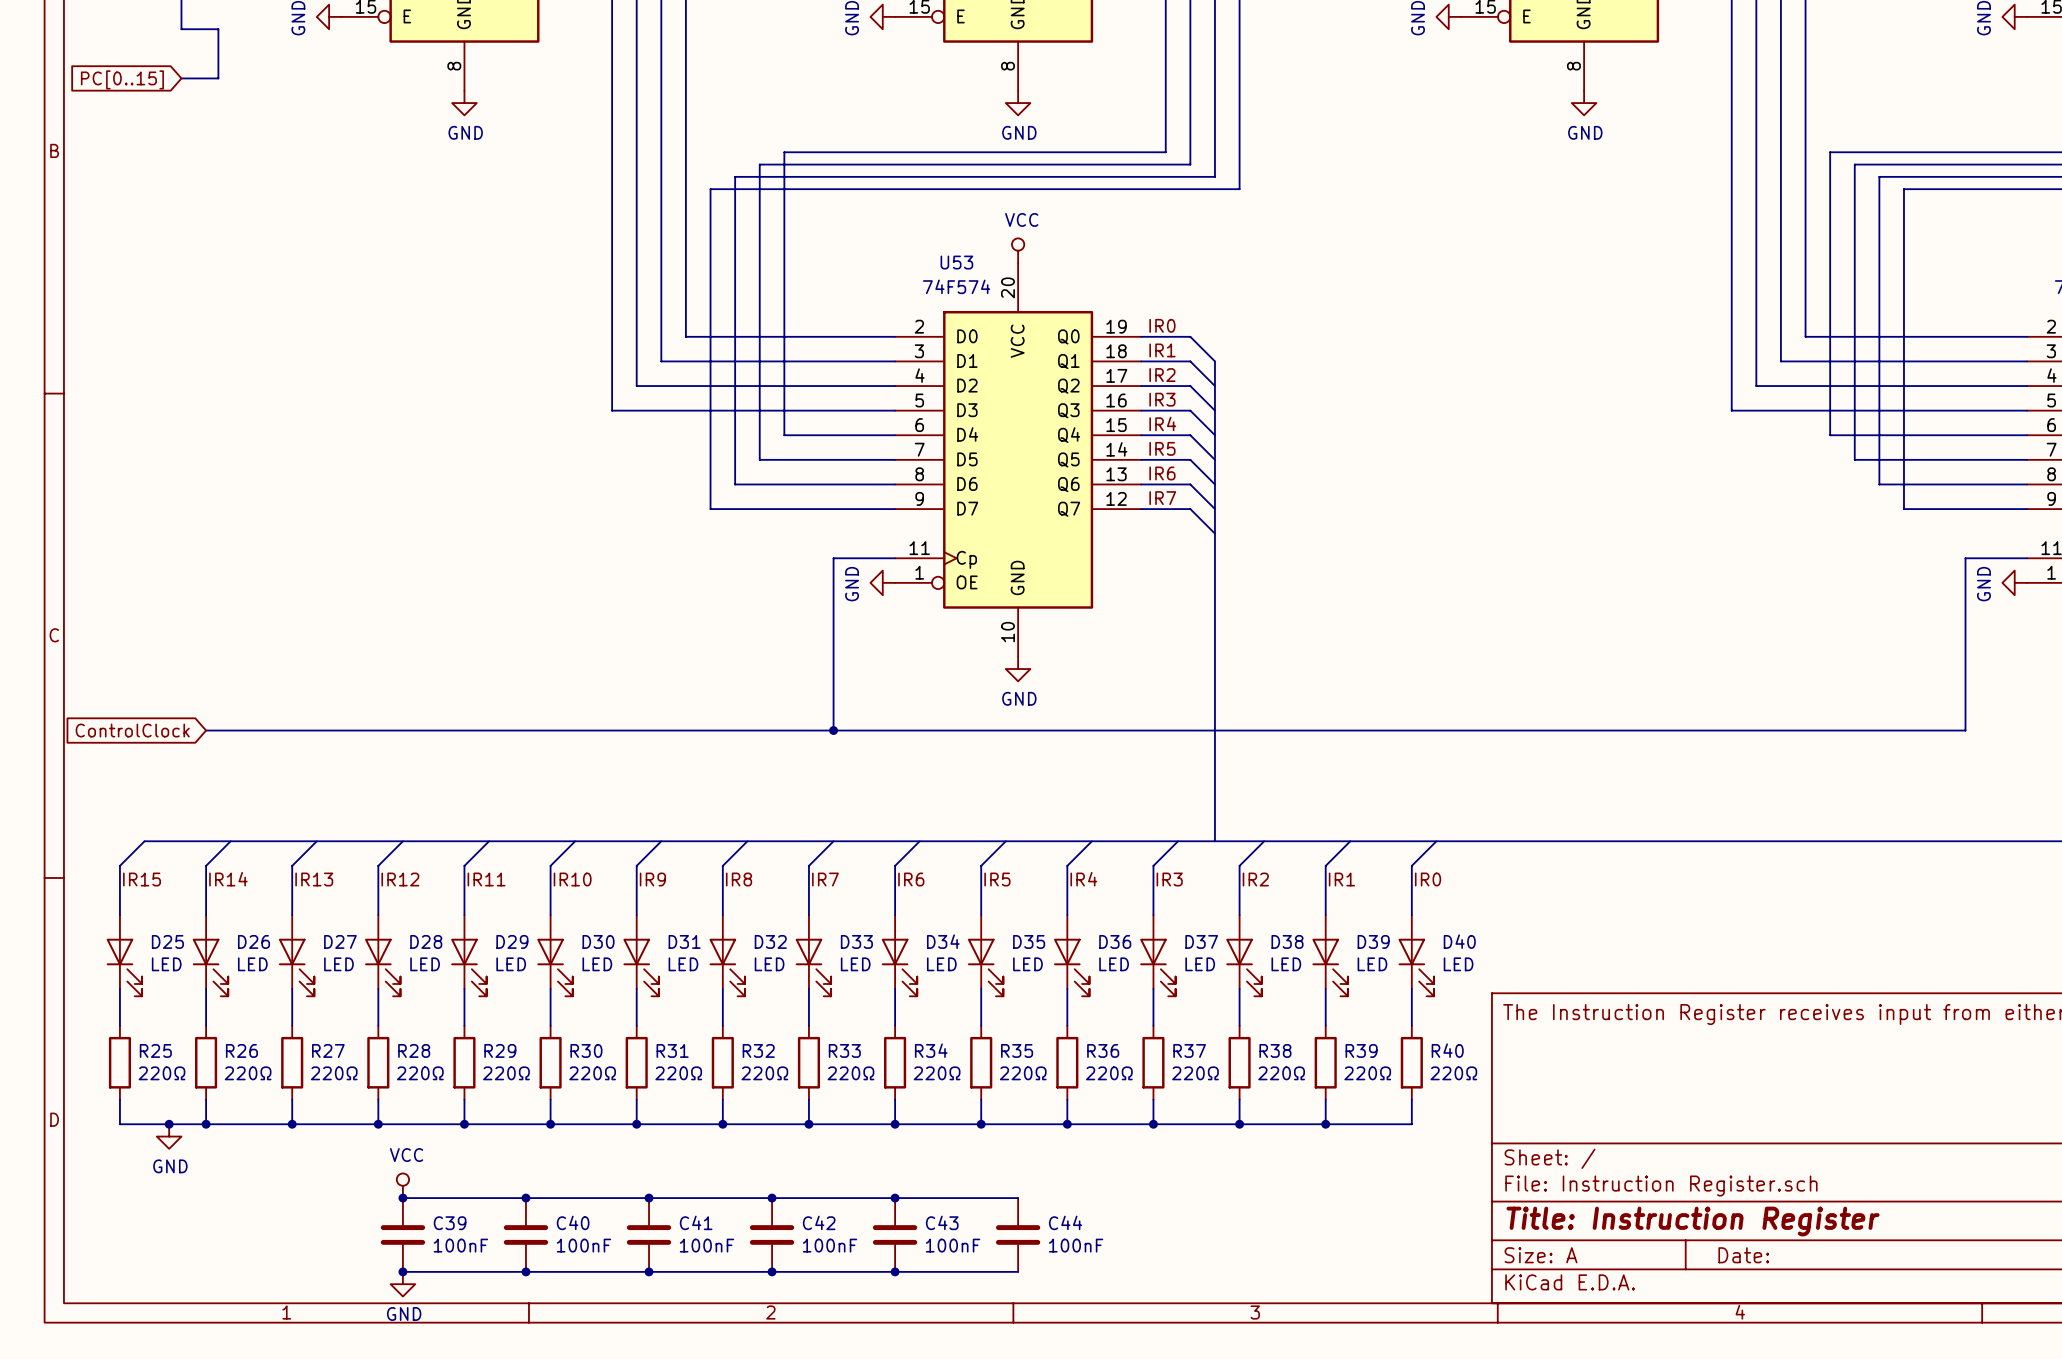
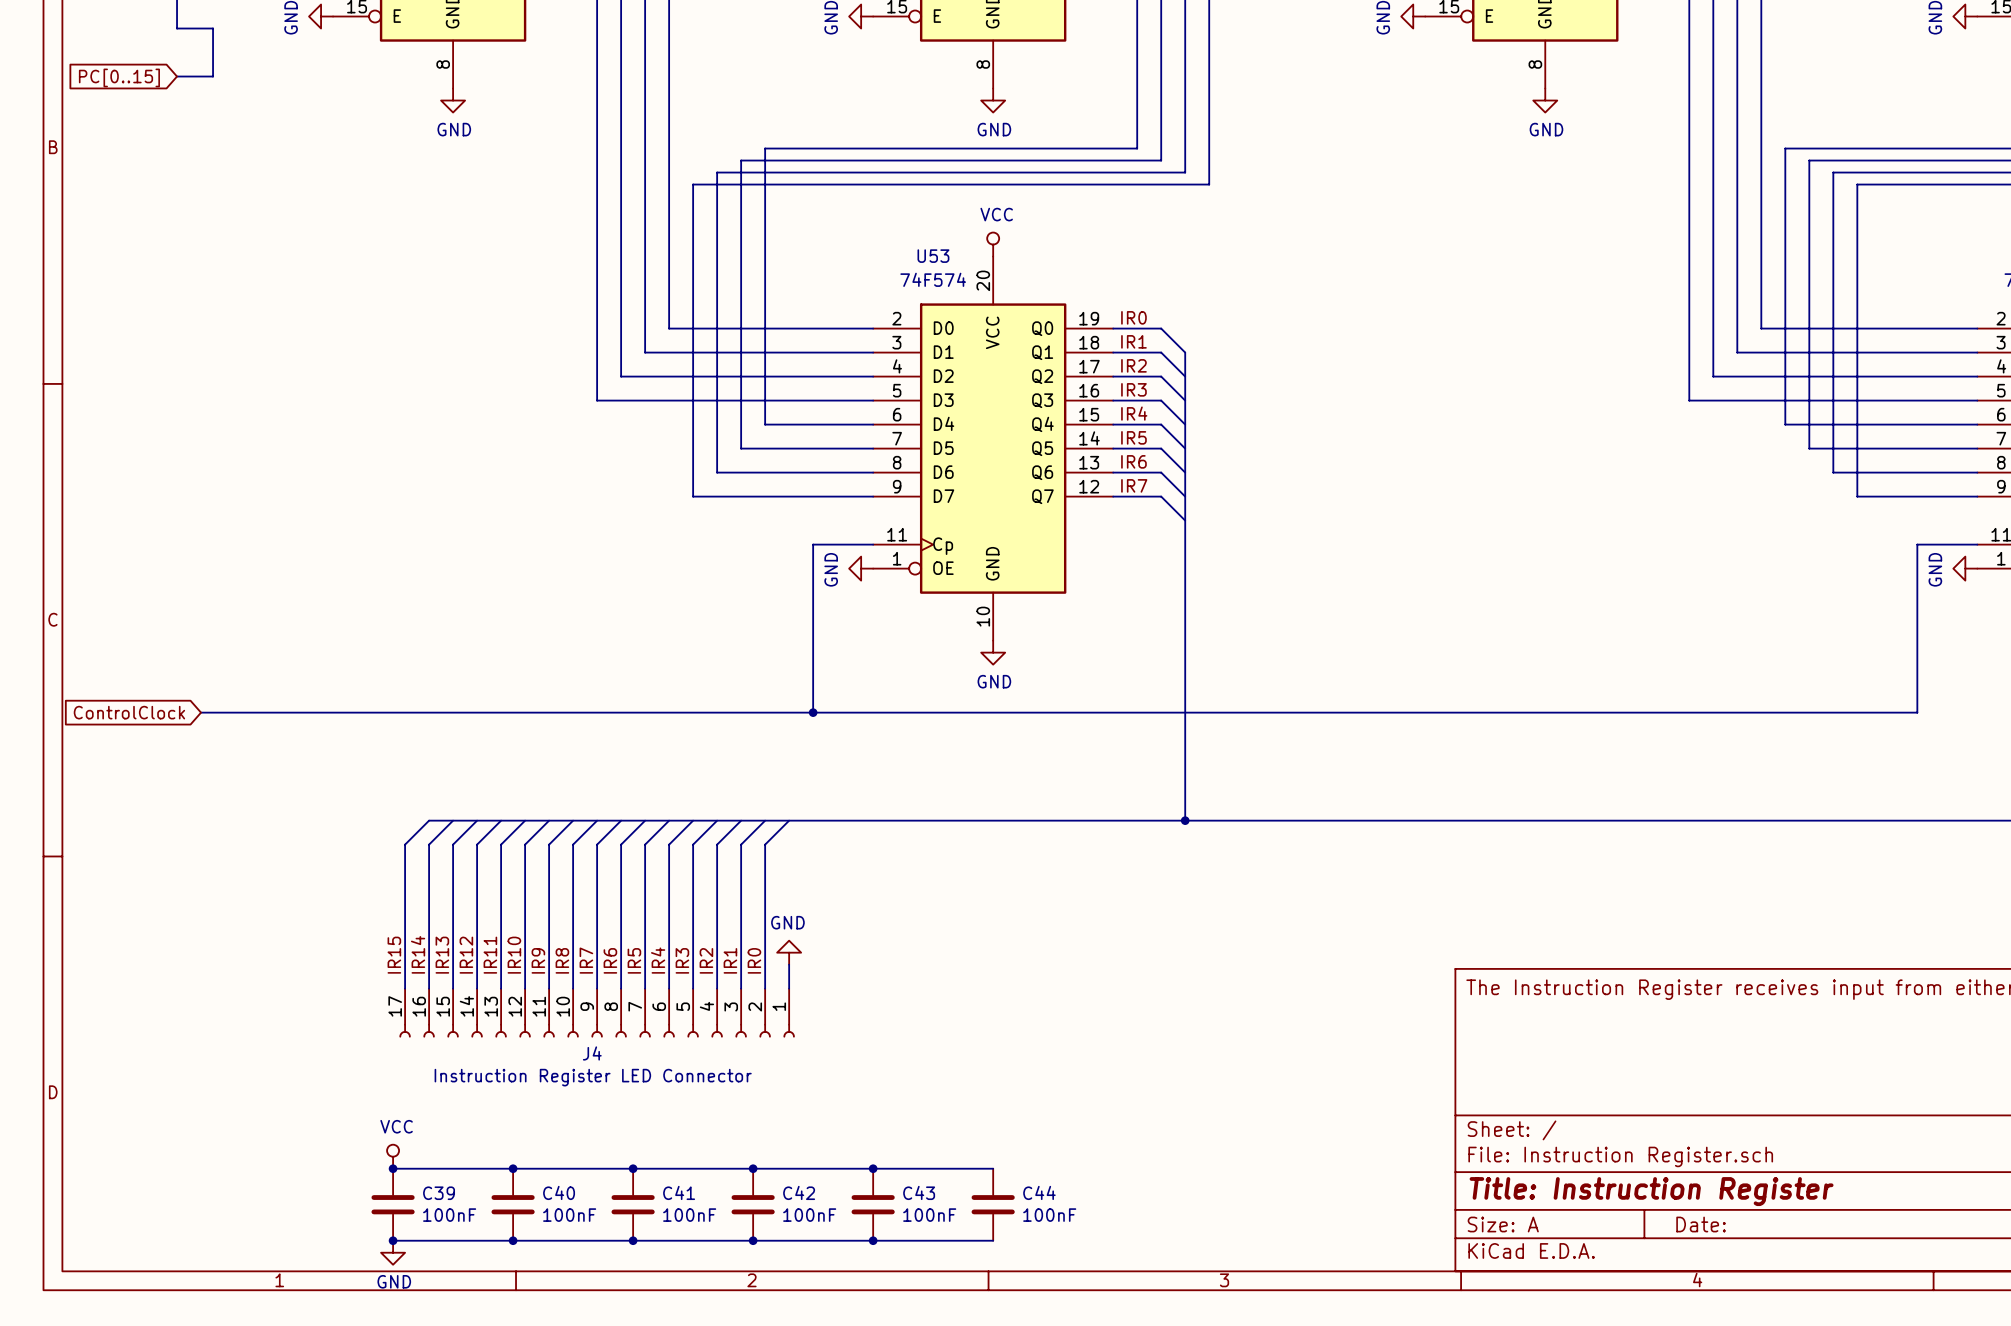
wire: (144, 841) (119, 865) (119, 915) -> none
bus: (144, 841) (439, 841) -> none
wire: (230, 841) (206, 865) (206, 915) -> none
wire: (316, 841) (292, 865) (292, 915) -> none
wire: (402, 841) (378, 865) (378, 915) -> none
wire: none -> (429, 820) (405, 844) (405, 988)
wire: none -> (453, 820) (429, 844) (429, 988)
wire: none -> (501, 820) (477, 844) (477, 988)
wire: none -> (525, 820) (501, 844) (501, 988)
wire: none -> (549, 820) (525, 844) (525, 988)
wire: (575, 841) (550, 865) (550, 915) -> none
wire: none -> (573, 820) (549, 844) (549, 988)
wire: none -> (597, 820) (573, 844) (573, 988)
wire: none -> (621, 820) (597, 844) (597, 988)
wire: none -> (669, 820) (645, 844) (645, 988)
wire: none -> (693, 820) (669, 844) (669, 988)
wire: none -> (717, 820) (693, 844) (693, 988)
wire: (747, 841) (722, 865) (722, 915) -> none
wire: none -> (741, 820) (717, 844) (717, 988)
wire: none -> (765, 820) (741, 844) (741, 988)
wire: none -> (789, 820) (765, 844) (765, 988)
wire: (833, 841) (808, 865) (808, 915) -> none
wire: (919, 841) (895, 865) (895, 915) -> none
wire: (1005, 841) (981, 865) (981, 915) -> none
wire: (1091, 841) (1067, 865) (1067, 915) -> none
wire: (1178, 841) (1153, 865) (1153, 915) -> none
junction: none -> (1185, 820)
wire: (1264, 841) (1239, 865) (1239, 915) -> none
wire: (1350, 841) (1325, 865) (1325, 915) -> none
wire: (1436, 841) (1411, 865) (1411, 915) -> none
label: IR15 (142, 879) -> none
label: IR14 (228, 879) -> none
label rotation: 0° (314, 879) -> 90° counterclockwise (442, 955)
label position: IR13 (314, 879) -> IR13 (442, 955)
label rotation: 0° (400, 879) -> 90° counterclockwise (466, 955)
label position: IR12 (400, 879) -> IR12 (466, 955)
label rotation: 0° (486, 879) -> 90° counterclockwise (490, 955)
label position: IR11 (486, 879) -> IR11 (490, 955)
label rotation: 0° (572, 879) -> 90° counterclockwise (514, 955)
label position: IR10 (572, 879) -> IR10 (514, 955)
label rotation: 0° (652, 879) -> 90° counterclockwise (538, 960)
label position: IR9 (652, 879) -> IR9 (538, 960)
label rotation: 0° (739, 879) -> 90° counterclockwise (562, 960)
label position: IR8 (739, 879) -> IR8 (562, 960)
label rotation: 0° (825, 879) -> 90° counterclockwise (586, 960)
label position: IR7 (825, 879) -> IR7 (586, 960)
label: IR6 (911, 879) -> none
label: IR5 (997, 879) -> none
label: IR4 (1083, 879) -> none
label: IR3 (1169, 879) -> none
label: IR2 (1255, 879) -> none
label: IR1 (1341, 879) -> none
label: IR0 (1428, 879) -> none
D25: LED (124, 955) -> none
D26: LED (210, 955) -> none
D27: LED (296, 955) -> none
D28: LED (382, 955) -> none
D29: LED (468, 955) -> none
D30: LED (555, 955) -> none
D31: LED (641, 955) -> none
D32: LED (727, 955) -> none
D33: LED (813, 955) -> none
D34: LED (899, 955) -> none
D35: LED (985, 955) -> none
D36: LED (1071, 955) -> none
D37: LED (1157, 955) -> none
D38: LED (1244, 955) -> none
D39: LED (1330, 955) -> none
D40: LED (1416, 955) -> none
power symbol: none -> GND (789, 952)
label: none -> IR14 (418, 954)
label: none -> IR15 (394, 955)
label: none -> IR4 (658, 960)
label: none -> IR6 (610, 960)
label: none -> IR5 (634, 960)
label: none -> IR3 (682, 960)
label: none -> IR2 (706, 960)
label: none -> IR1 (730, 960)
label: none -> IR0 (754, 960)
wire: (119, 988) (119, 1025) -> none
wire: (206, 988) (206, 1025) -> none
wire: (292, 988) (292, 1025) -> none
wire: (378, 988) (378, 1025) -> none
wire: (550, 988) (550, 1025) -> none
wire: (722, 988) (722, 1025) -> none
wire: (895, 988) (895, 1025) -> none
wire: (981, 988) (981, 1025) -> none
wire: (1067, 988) (1067, 1025) -> none
wire: (1153, 988) (1153, 1025) -> none
wire: (1239, 988) (1239, 1025) -> none
wire: (1325, 988) (1325, 1025) -> none
wire: (1411, 988) (1411, 1025) -> none
J4: none -> Instruction Register LED Connector (597, 1013)
R25: 220Ω (119, 1062) -> none
R26: 220Ω (206, 1062) -> none
R27: 220Ω (292, 1062) -> none
R28: 220Ω (378, 1062) -> none
R29: 220Ω (464, 1062) -> none
R30: 220Ω (550, 1062) -> none
R31: 220Ω (636, 1062) -> none
R32: 220Ω (722, 1062) -> none
R33: 220Ω (808, 1062) -> none
R34: 220Ω (895, 1062) -> none
R35: 220Ω (981, 1062) -> none
R36: 220Ω (1067, 1062) -> none
R37: 220Ω (1153, 1062) -> none
R38: 220Ω (1239, 1062) -> none
R39: 220Ω (1325, 1062) -> none
R40: 220Ω (1411, 1062) -> none
wire: (119, 1099) (119, 1124) (1411, 1124) (1411, 1099) -> none
wire: (206, 1099) (206, 1124) -> none
wire: (292, 1099) (292, 1124) -> none
wire: (378, 1099) (378, 1124) -> none
wire: (464, 1099) (464, 1124) -> none
wire: (550, 1099) (550, 1124) -> none
wire: (636, 1099) (636, 1124) -> none
wire: (722, 1099) (722, 1124) -> none
wire: (808, 1099) (808, 1124) -> none
wire: (895, 1099) (895, 1124) -> none
wire: (981, 1099) (981, 1124) -> none
wire: (1067, 1099) (1067, 1124) -> none
wire: (1153, 1099) (1153, 1124) -> none
wire: (1239, 1099) (1239, 1124) -> none
wire: (1325, 1099) (1325, 1124) -> none
junction: (169, 1124) -> none
junction: (206, 1124) -> none
junction: (292, 1124) -> none
junction: (378, 1124) -> none
junction: (464, 1124) -> none
junction: (550, 1124) -> none
junction: (636, 1124) -> none
junction: (722, 1124) -> none
junction: (808, 1124) -> none
junction: (895, 1124) -> none
junction: (981, 1124) -> none
junction: (1067, 1124) -> none
junction: (1153, 1124) -> none
junction: (1239, 1124) -> none
junction: (1325, 1124) -> none
power symbol: GND (169, 1136) -> none

